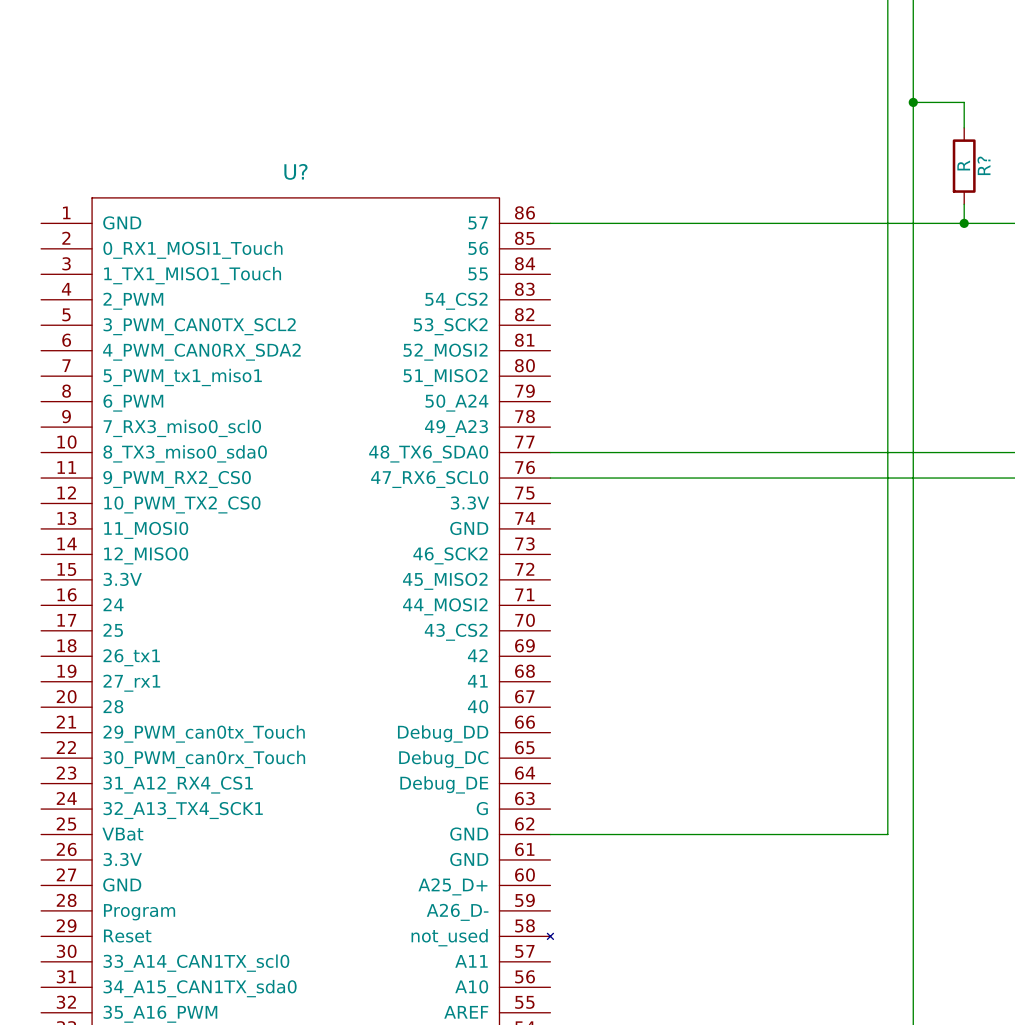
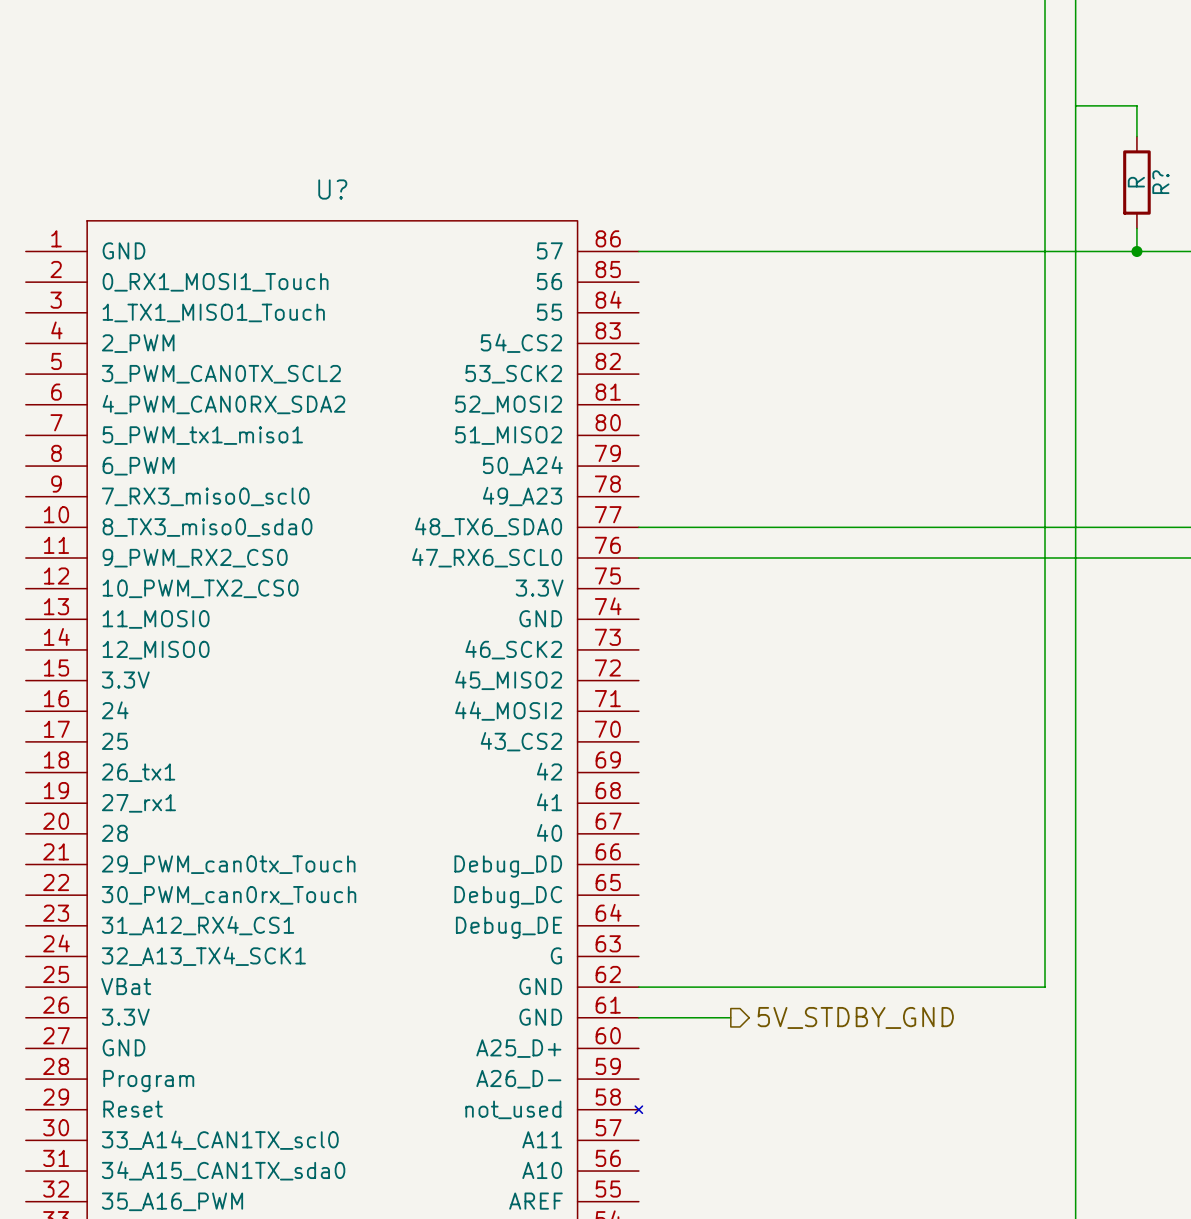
junction: (913, 102) -> none
wire: none -> (638, 1017) (730, 1017)
hierarchical label: none -> 5V_STDBY_GND (855, 1017)

